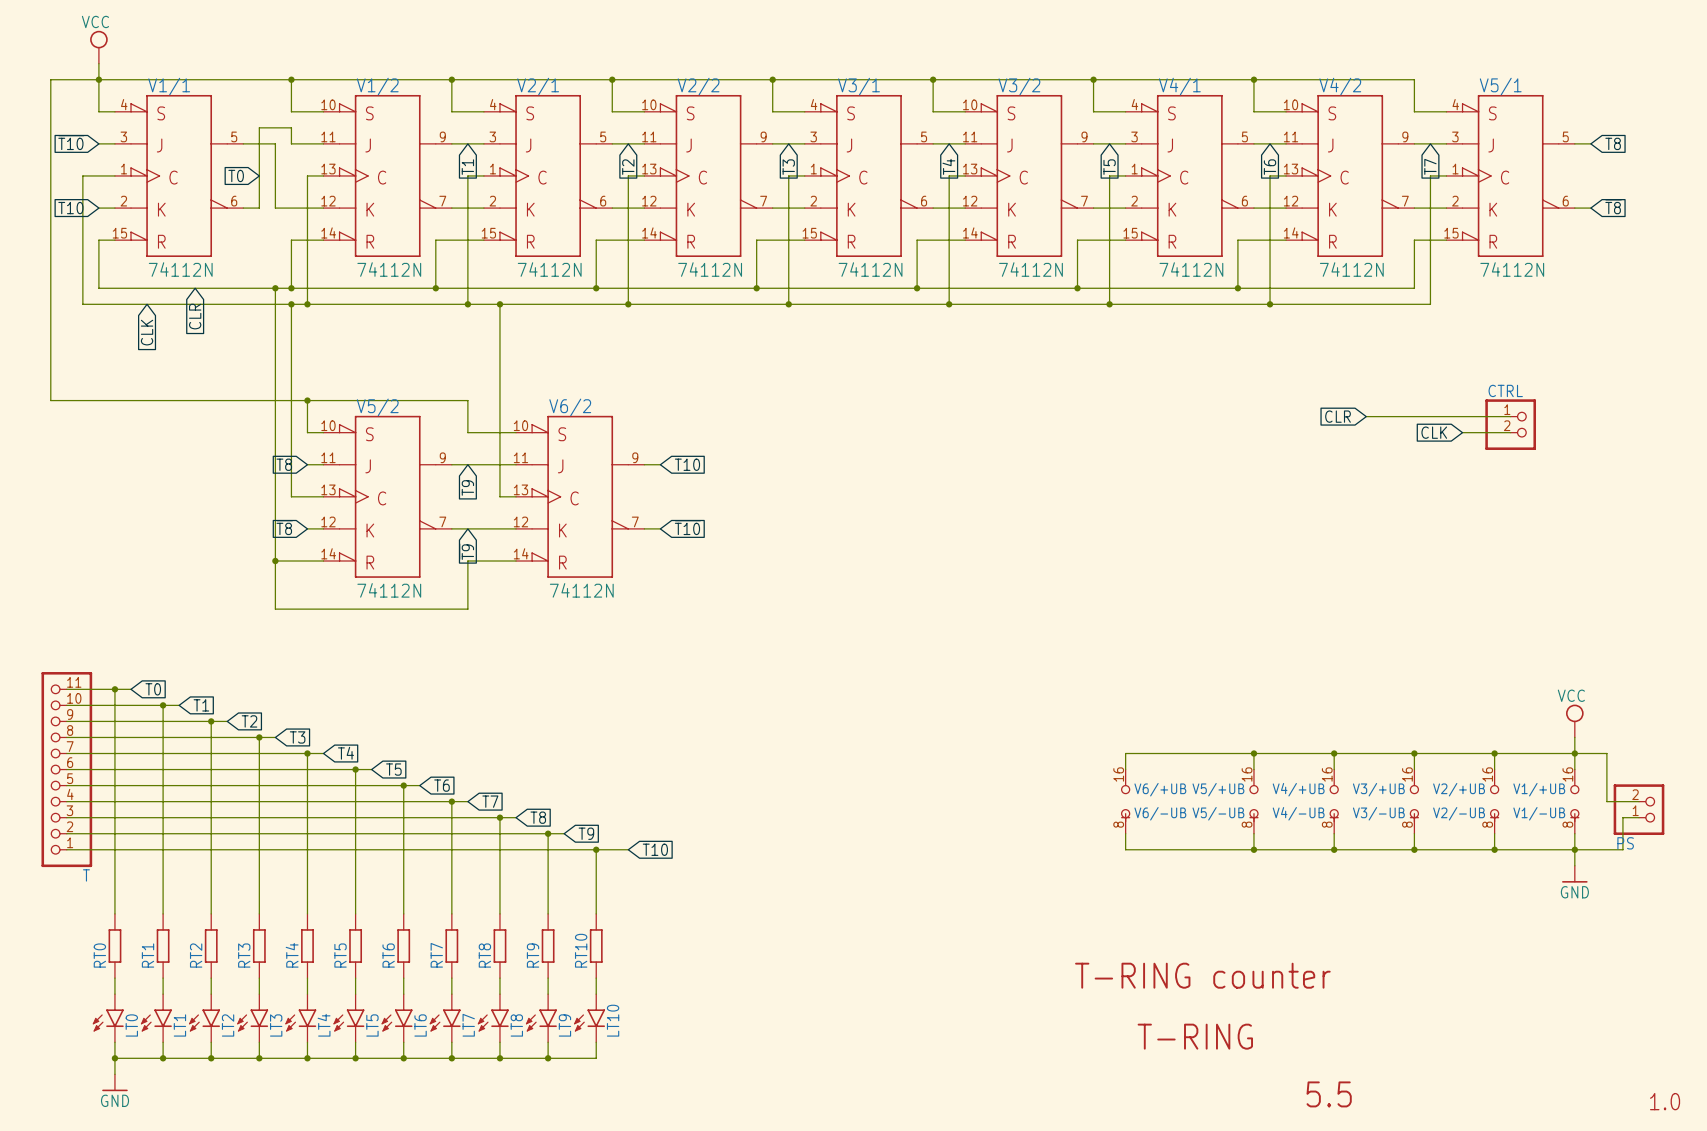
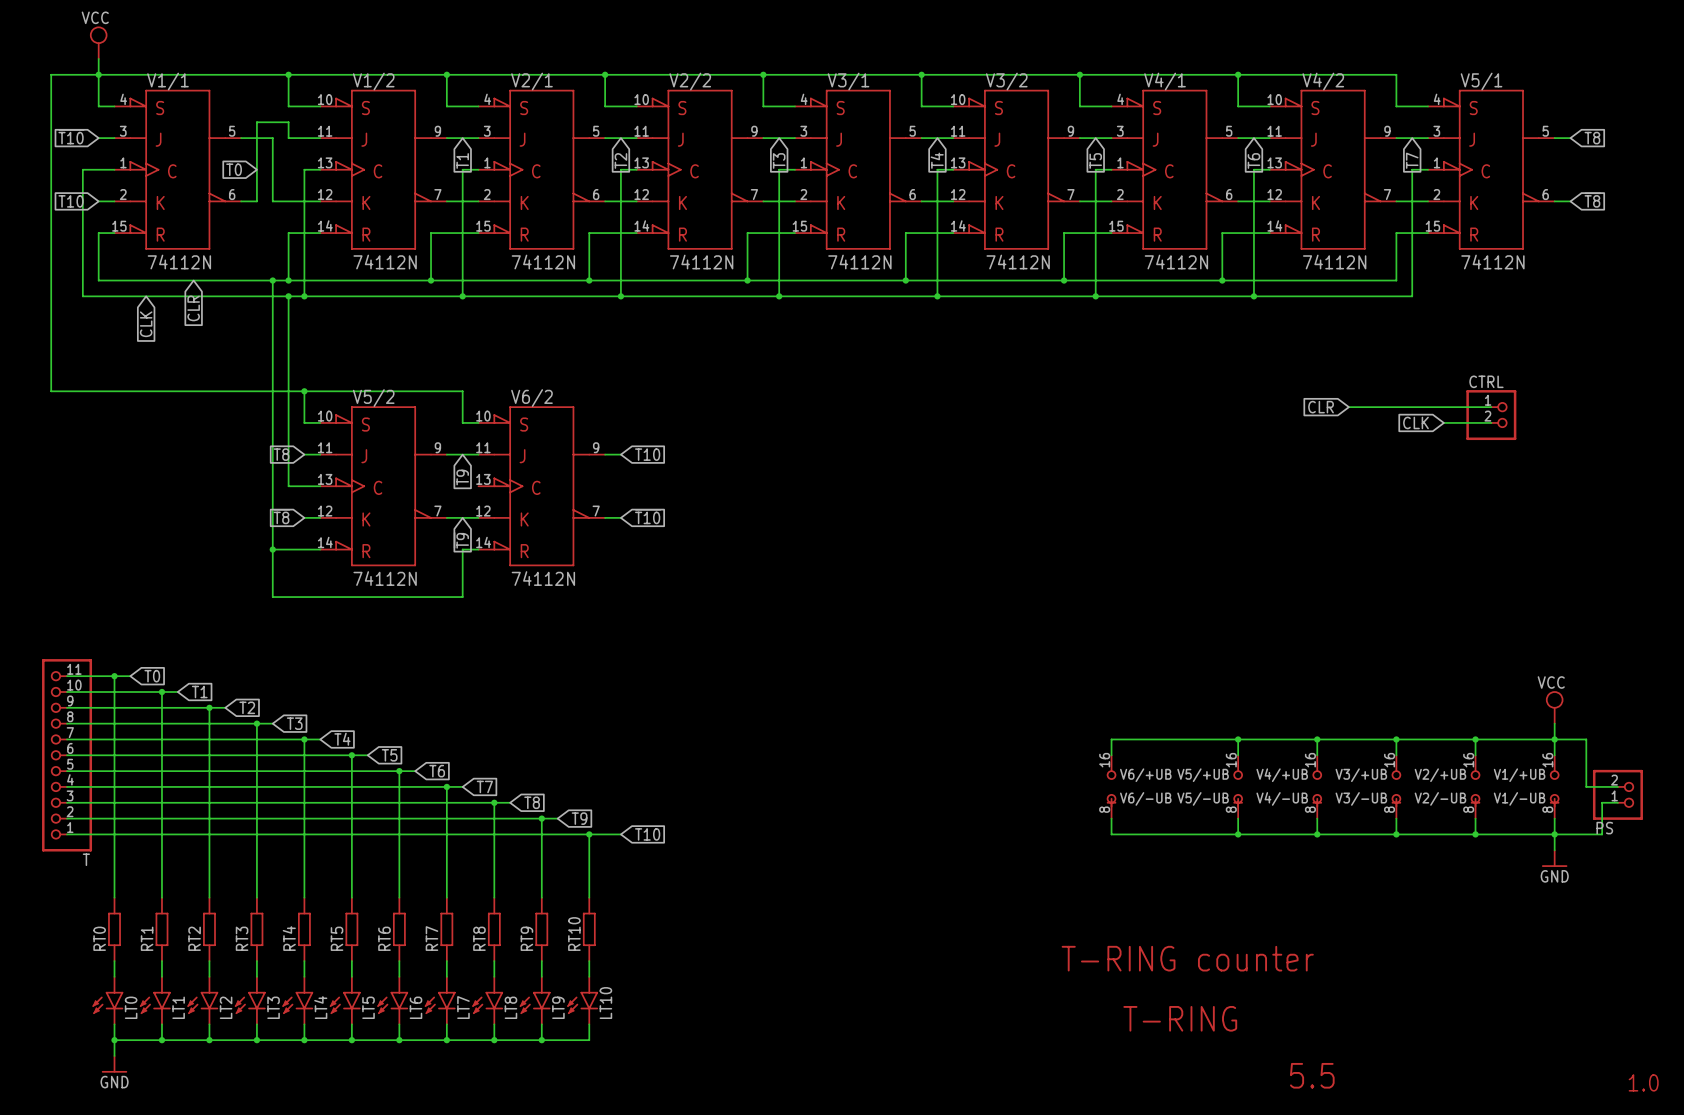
wire: (499, 304) (499, 496) (516, 496) -> none
junction: (499, 304) -> none
global label position: T10 (687, 464) -> T10 (647, 454)
V6/2 position: (580, 496) -> (541, 486)
global label position: ~{T10} (687, 527) -> ~{T10} (648, 516)

